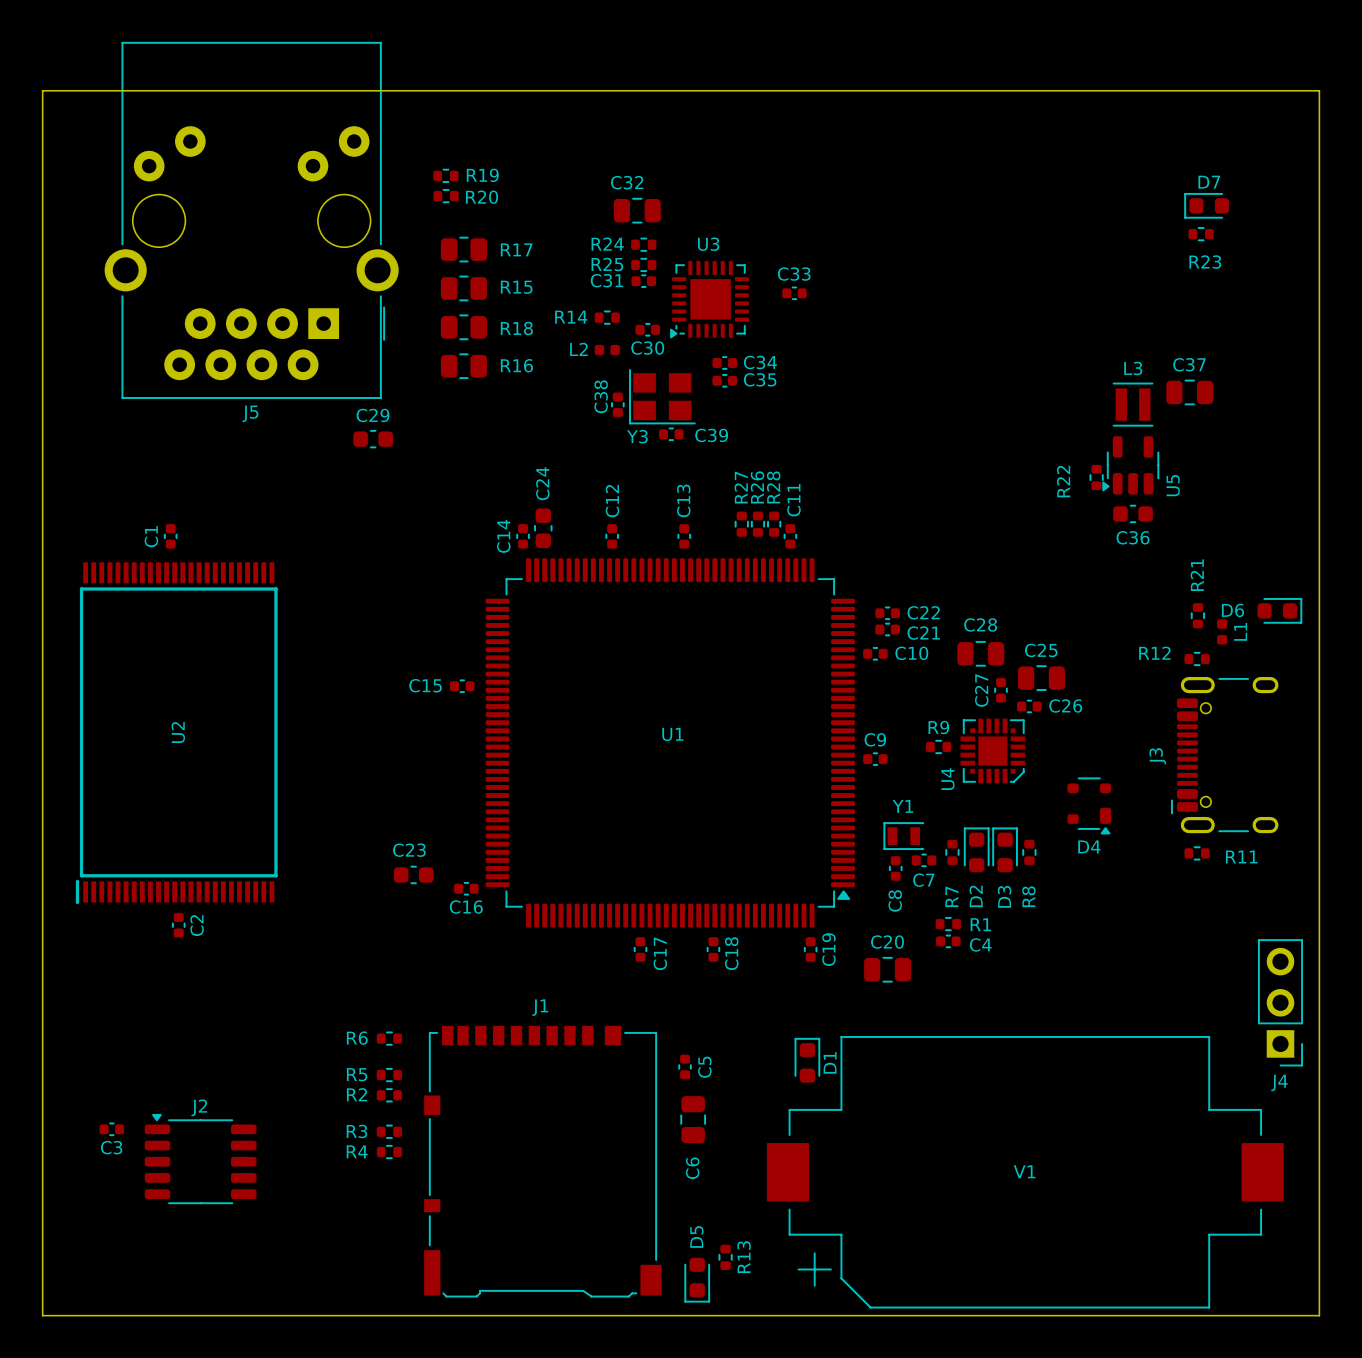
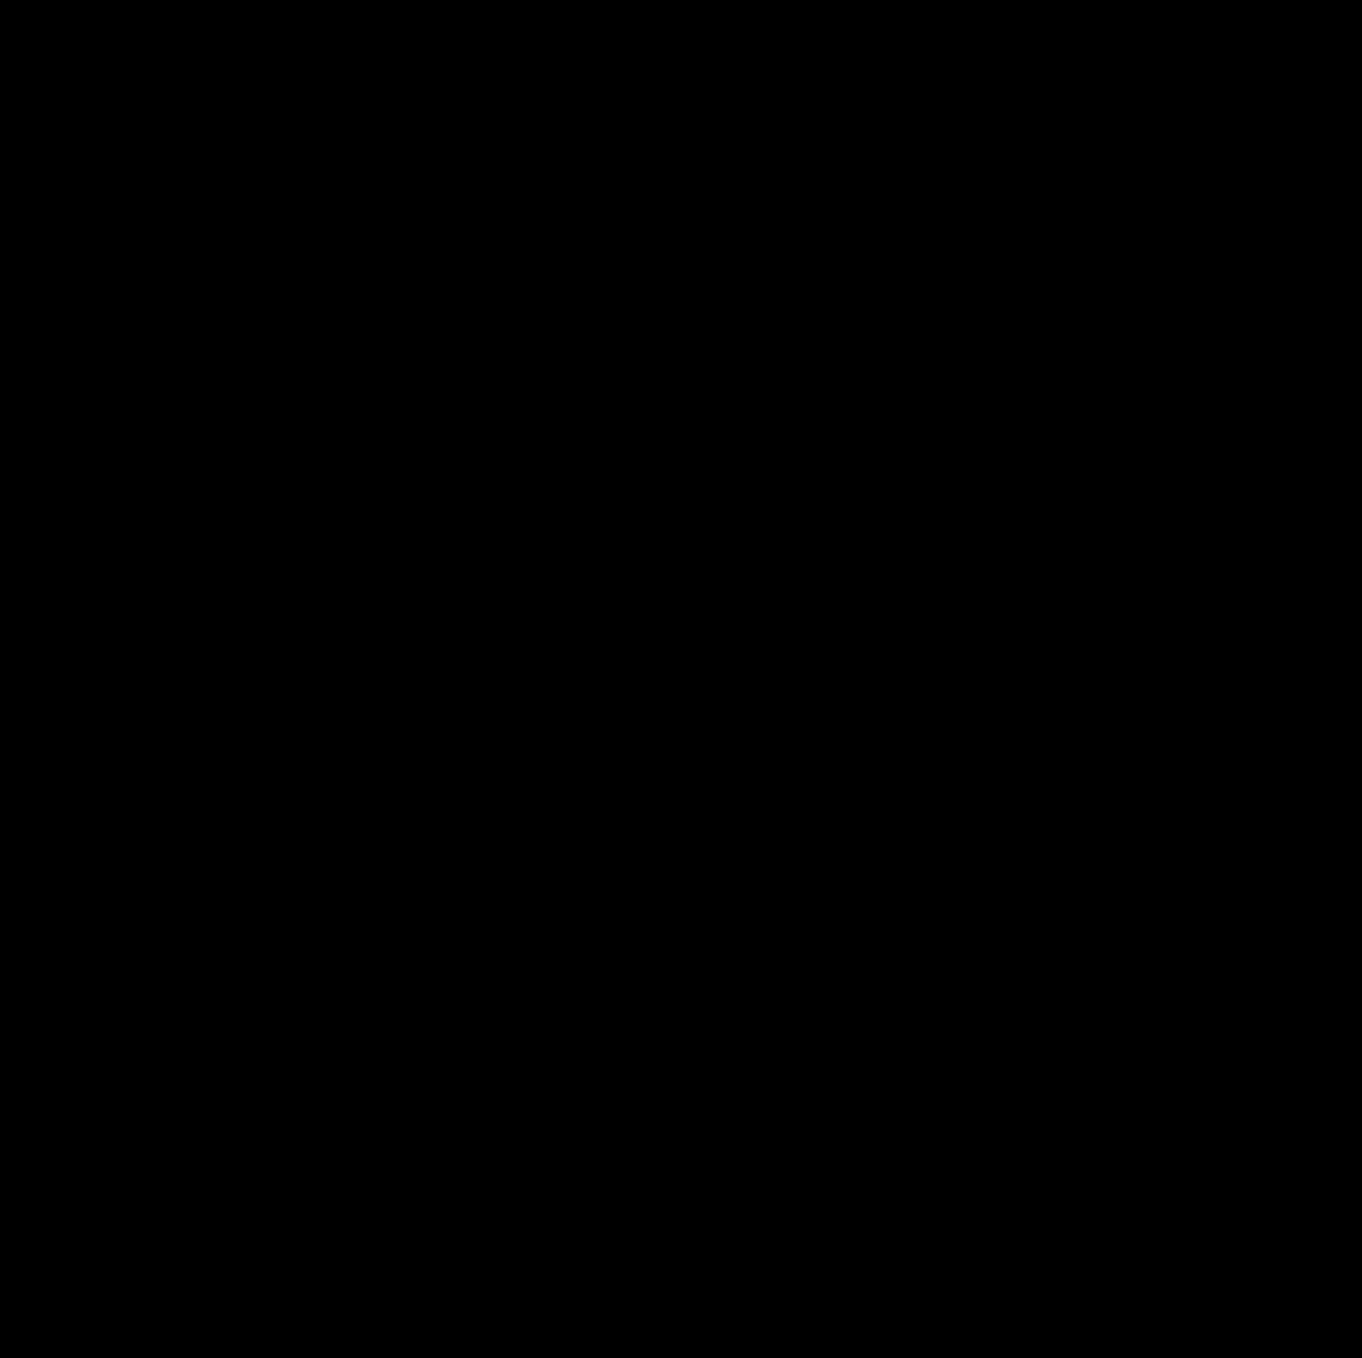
board edge: (42, 90) (1319, 90) (1319, 1315) (42, 1315) (42, 90) -> none
R19: (445, 175) -> none
R20: (446, 196) -> none
D7: (1206, 205) -> none
C32: (637, 210) -> none
J5: (251, 220) -> none
R23: (1201, 234) -> none
R24: (643, 244) -> none
R17: (463, 249) -> none
R25: (643, 264) -> none
C31: (643, 281) -> none
R15: (463, 288) -> none
C33: (794, 293) -> none
U3: (709, 299) -> none
R14: (607, 317) -> none
R18: (463, 327) -> none
C30: (647, 329) -> none
L2: (607, 350) -> none
C34: (724, 362) -> none
R16: (463, 366) -> none
C35: (724, 380) -> none
C37: (1189, 392) -> none
Y3: (662, 396) -> none
C38: (617, 404) -> none
L3: (1133, 404) -> none
C39: (671, 434) -> none
C29: (373, 439) -> none
U5: (1130, 465) -> none
R22: (1096, 477) -> none
C36: (1133, 513) -> none
R27: (741, 524) -> none
R26: (757, 524) -> none
R28: (774, 524) -> none
C24: (543, 528) -> none
C1: (170, 536) -> none
C14: (523, 536) -> none
C12: (612, 536) -> none
C13: (684, 536) -> none
C11: (790, 536) -> none
D6: (1279, 610) -> none
C22: (887, 613) -> none
R21: (1197, 615) -> none
C21: (887, 629) -> none
L1: (1222, 631) -> none
C10: (875, 653) -> none
C28: (980, 653) -> none
R12: (1197, 658) -> none
C25: (1041, 678) -> none
C15: (462, 686) -> none
C27: (1001, 690) -> none
C26: (1029, 706) -> none
U2: (176, 733) -> none
U1: (670, 742) -> none
R9: (938, 746) -> none
U4: (992, 751) -> none
J3: (1224, 755) -> none
C9: (875, 759) -> none
D4: (1089, 805) -> none
Y1: (903, 836) -> none
D2: (976, 849) -> none
D3: (1005, 849) -> none
R7: (952, 852) -> none
R8: (1029, 852) -> none
R11: (1197, 853) -> none
C7: (924, 860) -> none
C8: (895, 868) -> none
C23: (413, 874) -> none
C16: (466, 888) -> none
R1: (948, 924) -> none
C2: (178, 925) -> none
C4: (948, 941) -> none
C17: (640, 949) -> none
C18: (713, 949) -> none
C19: (810, 949) -> none
C20: (887, 969) -> none
J4: (1280, 1002) -> none
R6: (389, 1038) -> none
D1: (807, 1060) -> none
C5: (685, 1066) -> none
R5: (389, 1075) -> none
R2: (389, 1095) -> none
C6: (693, 1119) -> none
C3: (111, 1129) -> none
R3: (389, 1131) -> none
R4: (389, 1152) -> none
J2: (200, 1159) -> none
J1: (542, 1161) -> none
V1: (1025, 1172) -> none
R13: (725, 1257) -> none
D5: (697, 1280) -> none

